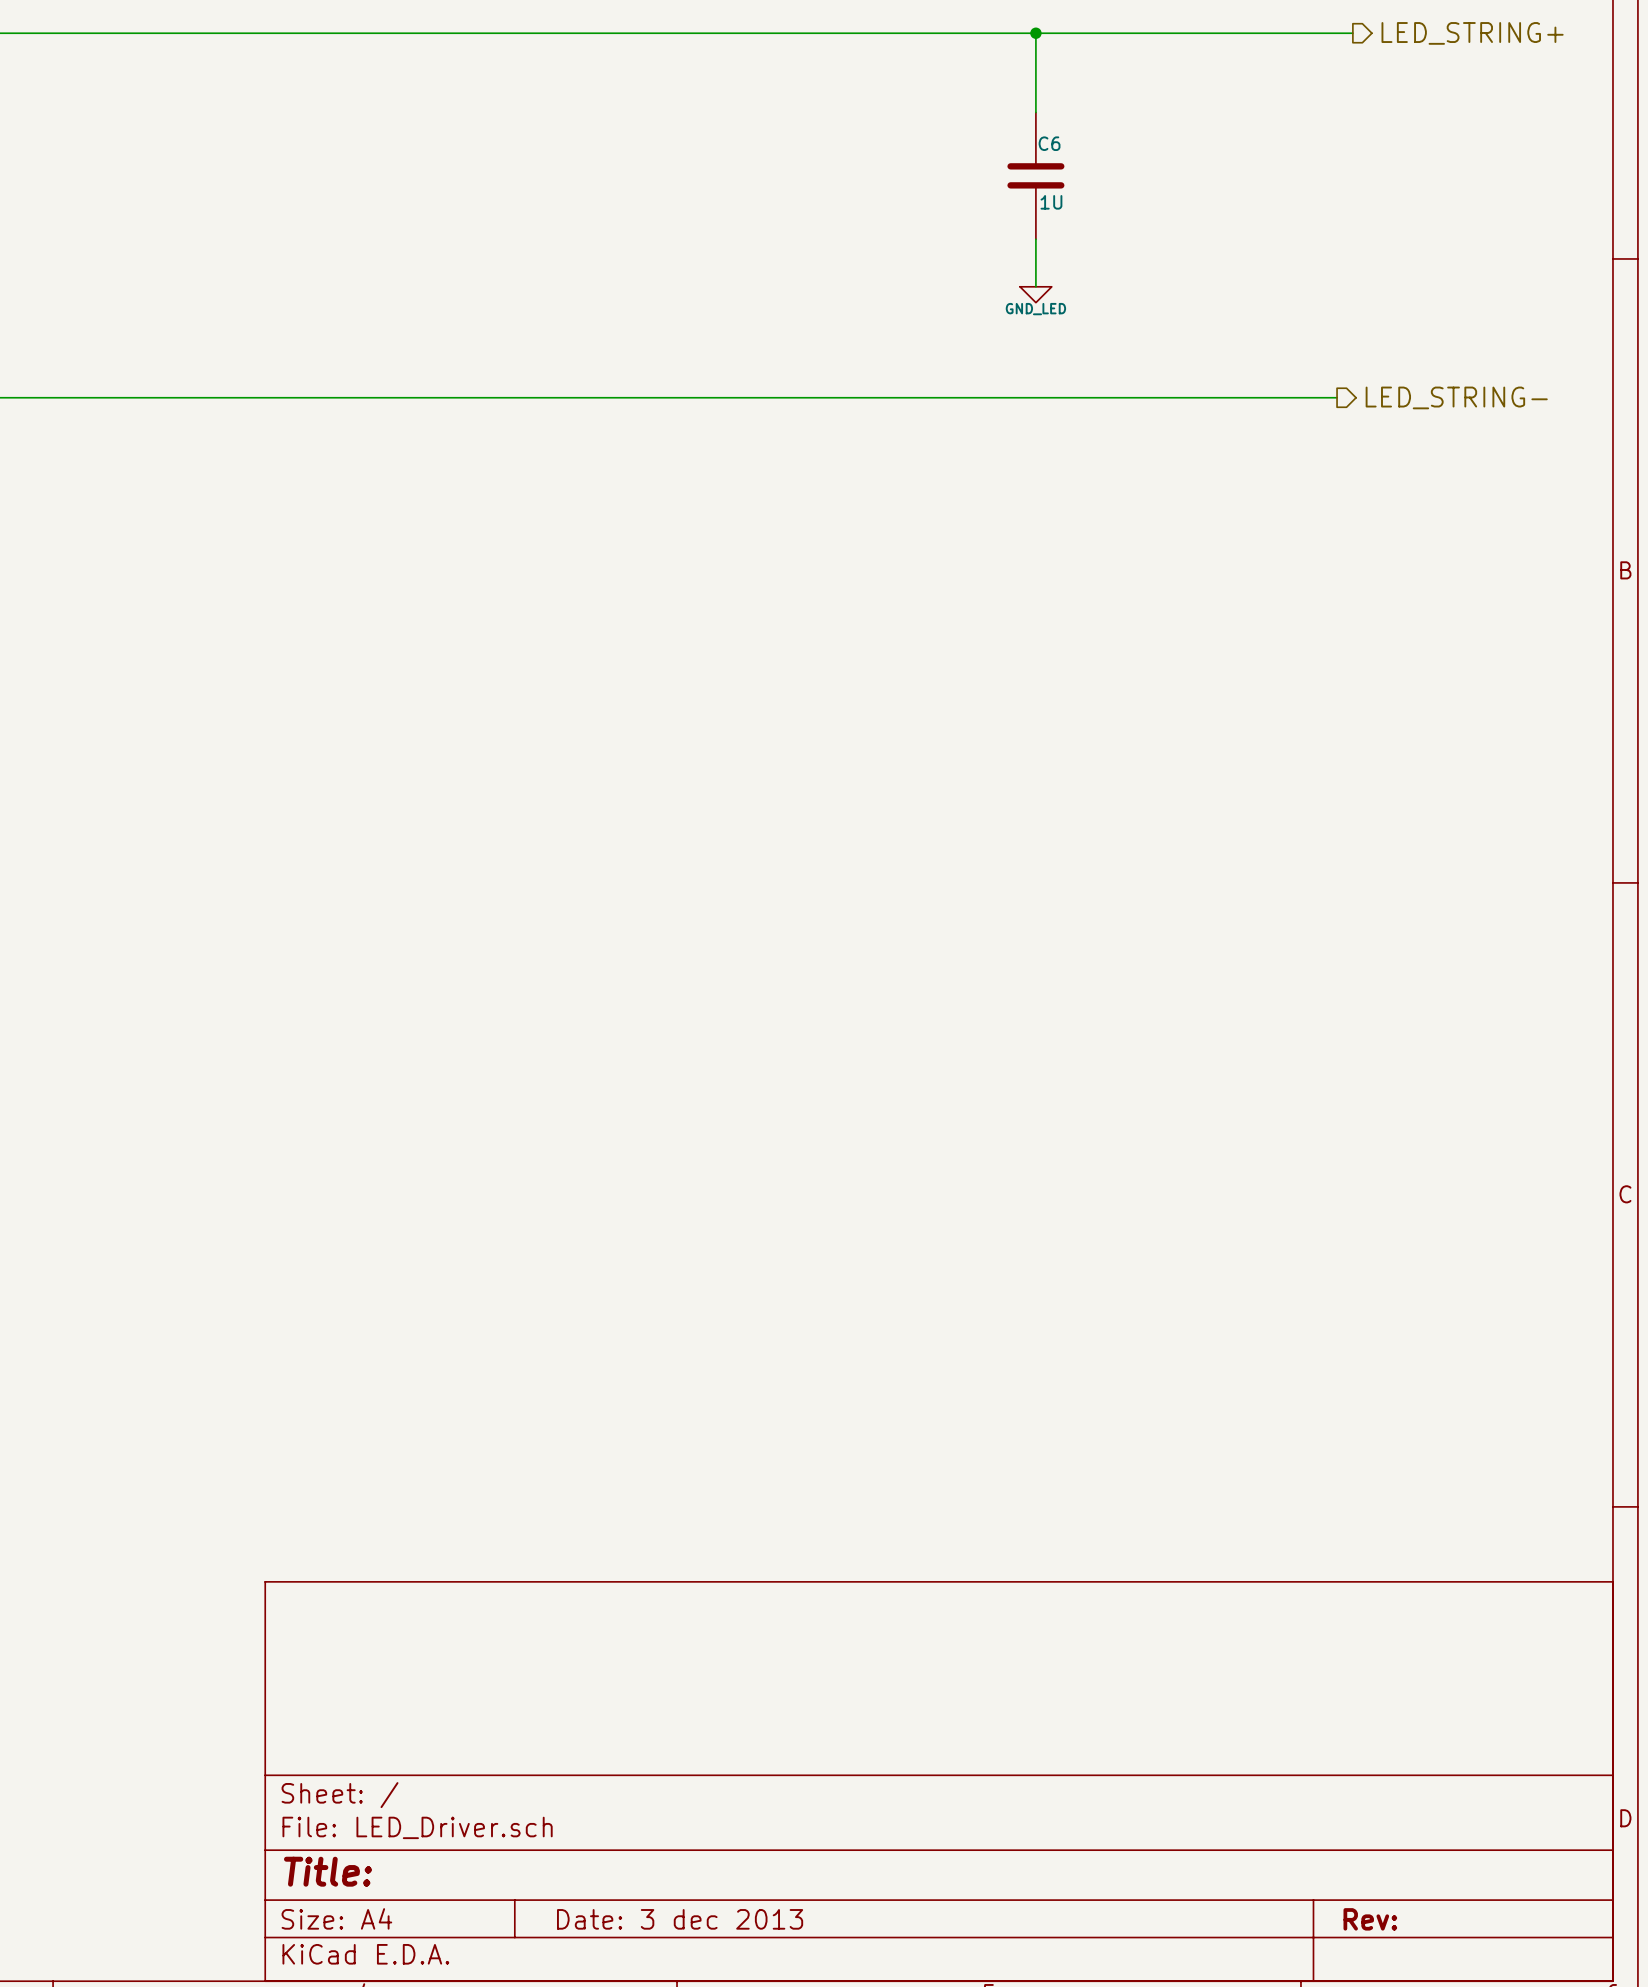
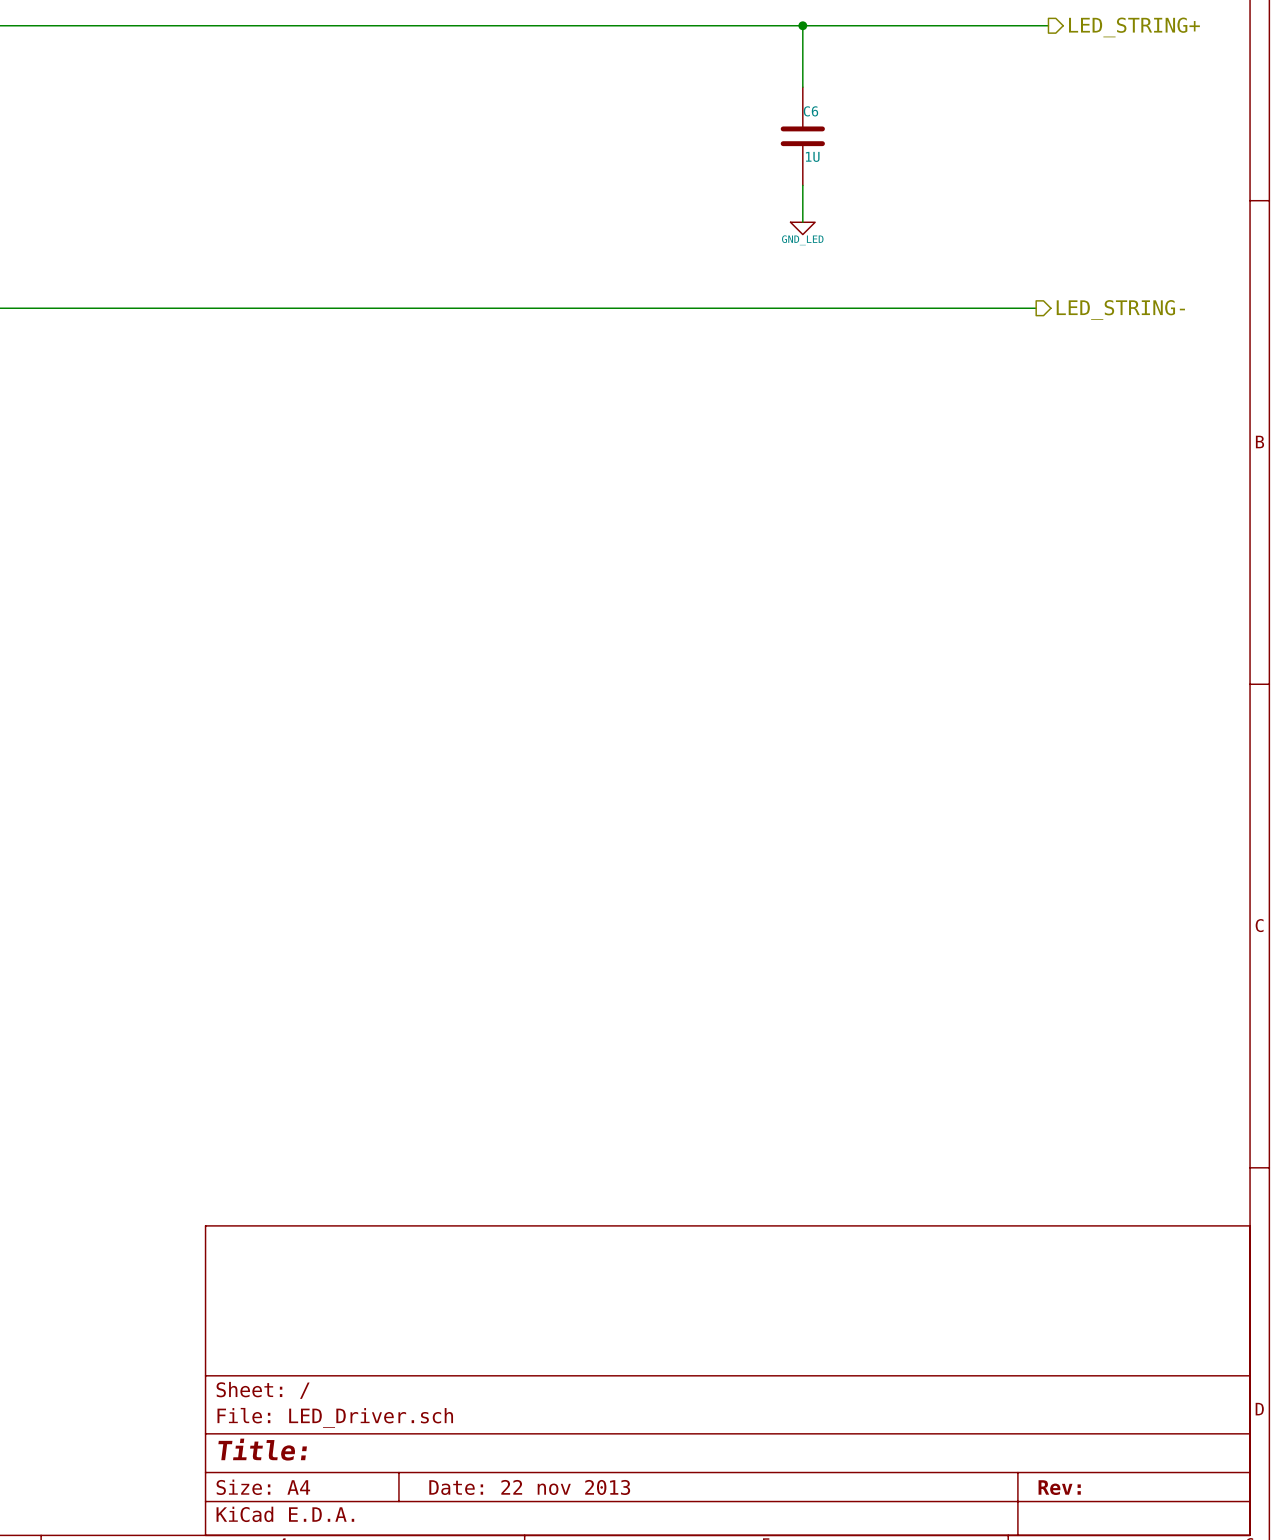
title block: Date: 3 dec 2013 (680, 1919) -> Date: 22 nov 2013 (529, 1487)

